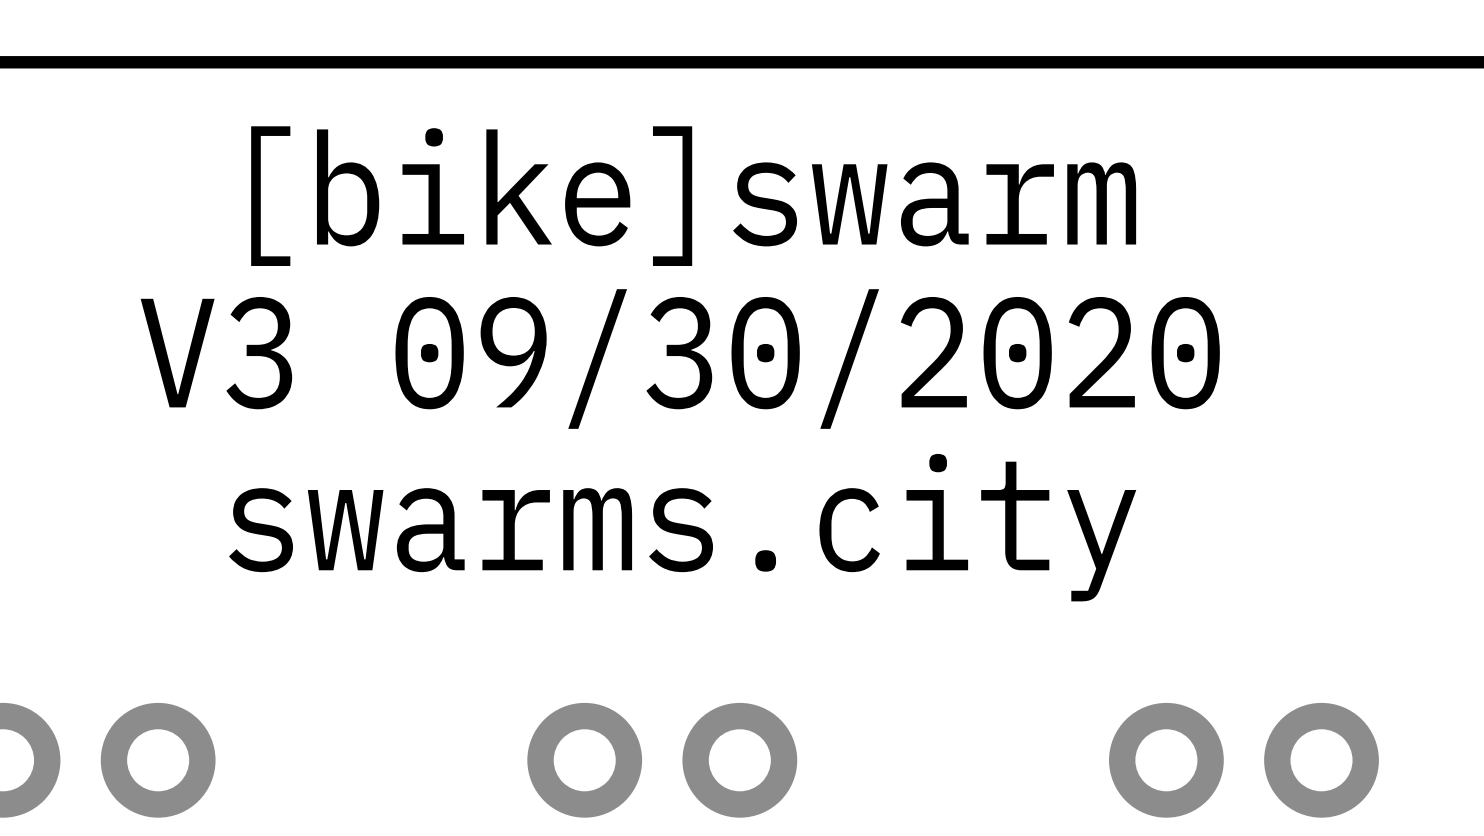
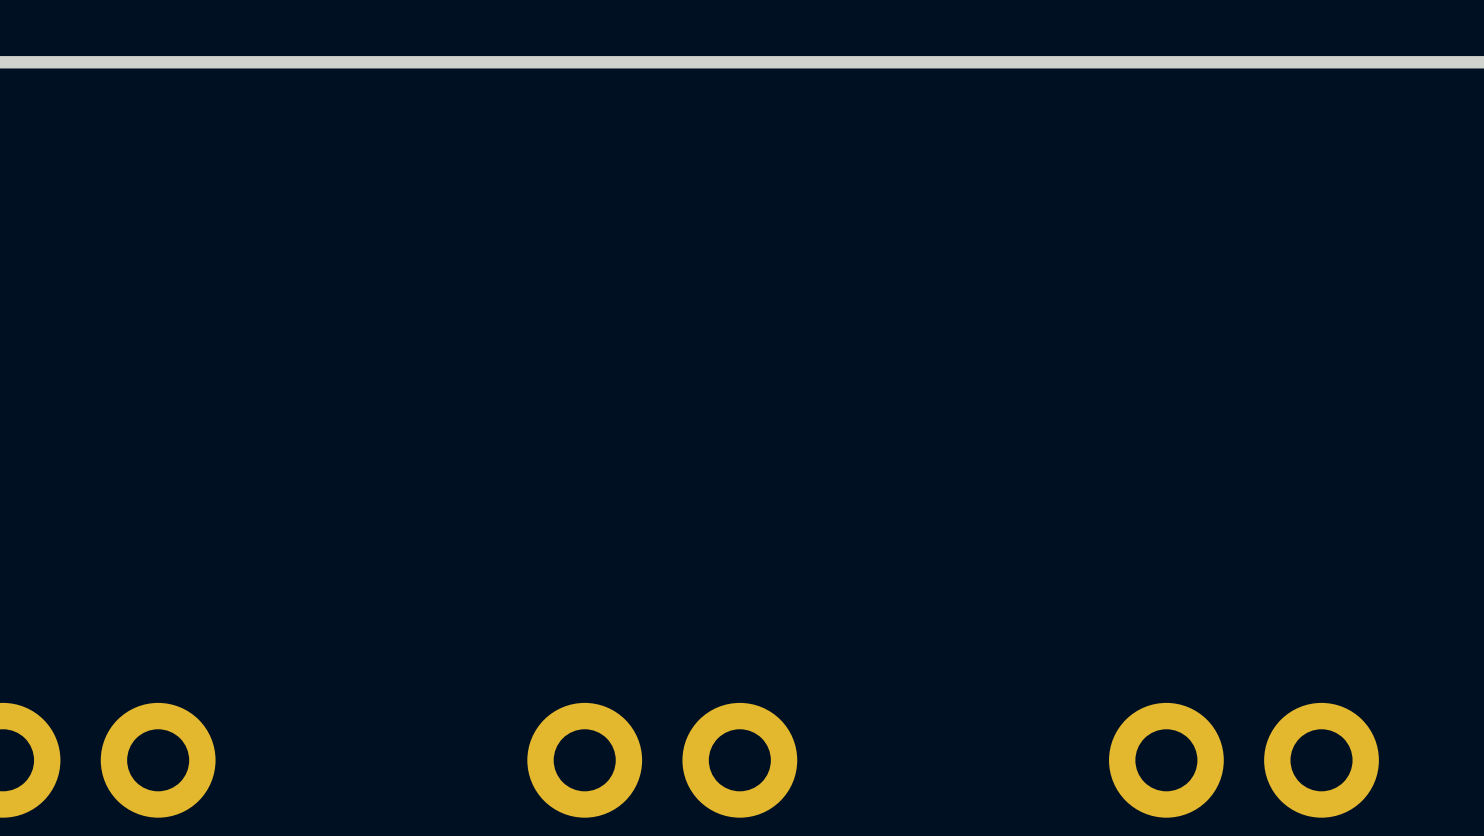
text: [bike]swarm (693, 196) -> none
text: V3 09/30/2020 (680, 359) -> none
text: swarms.city (682, 527) -> none

